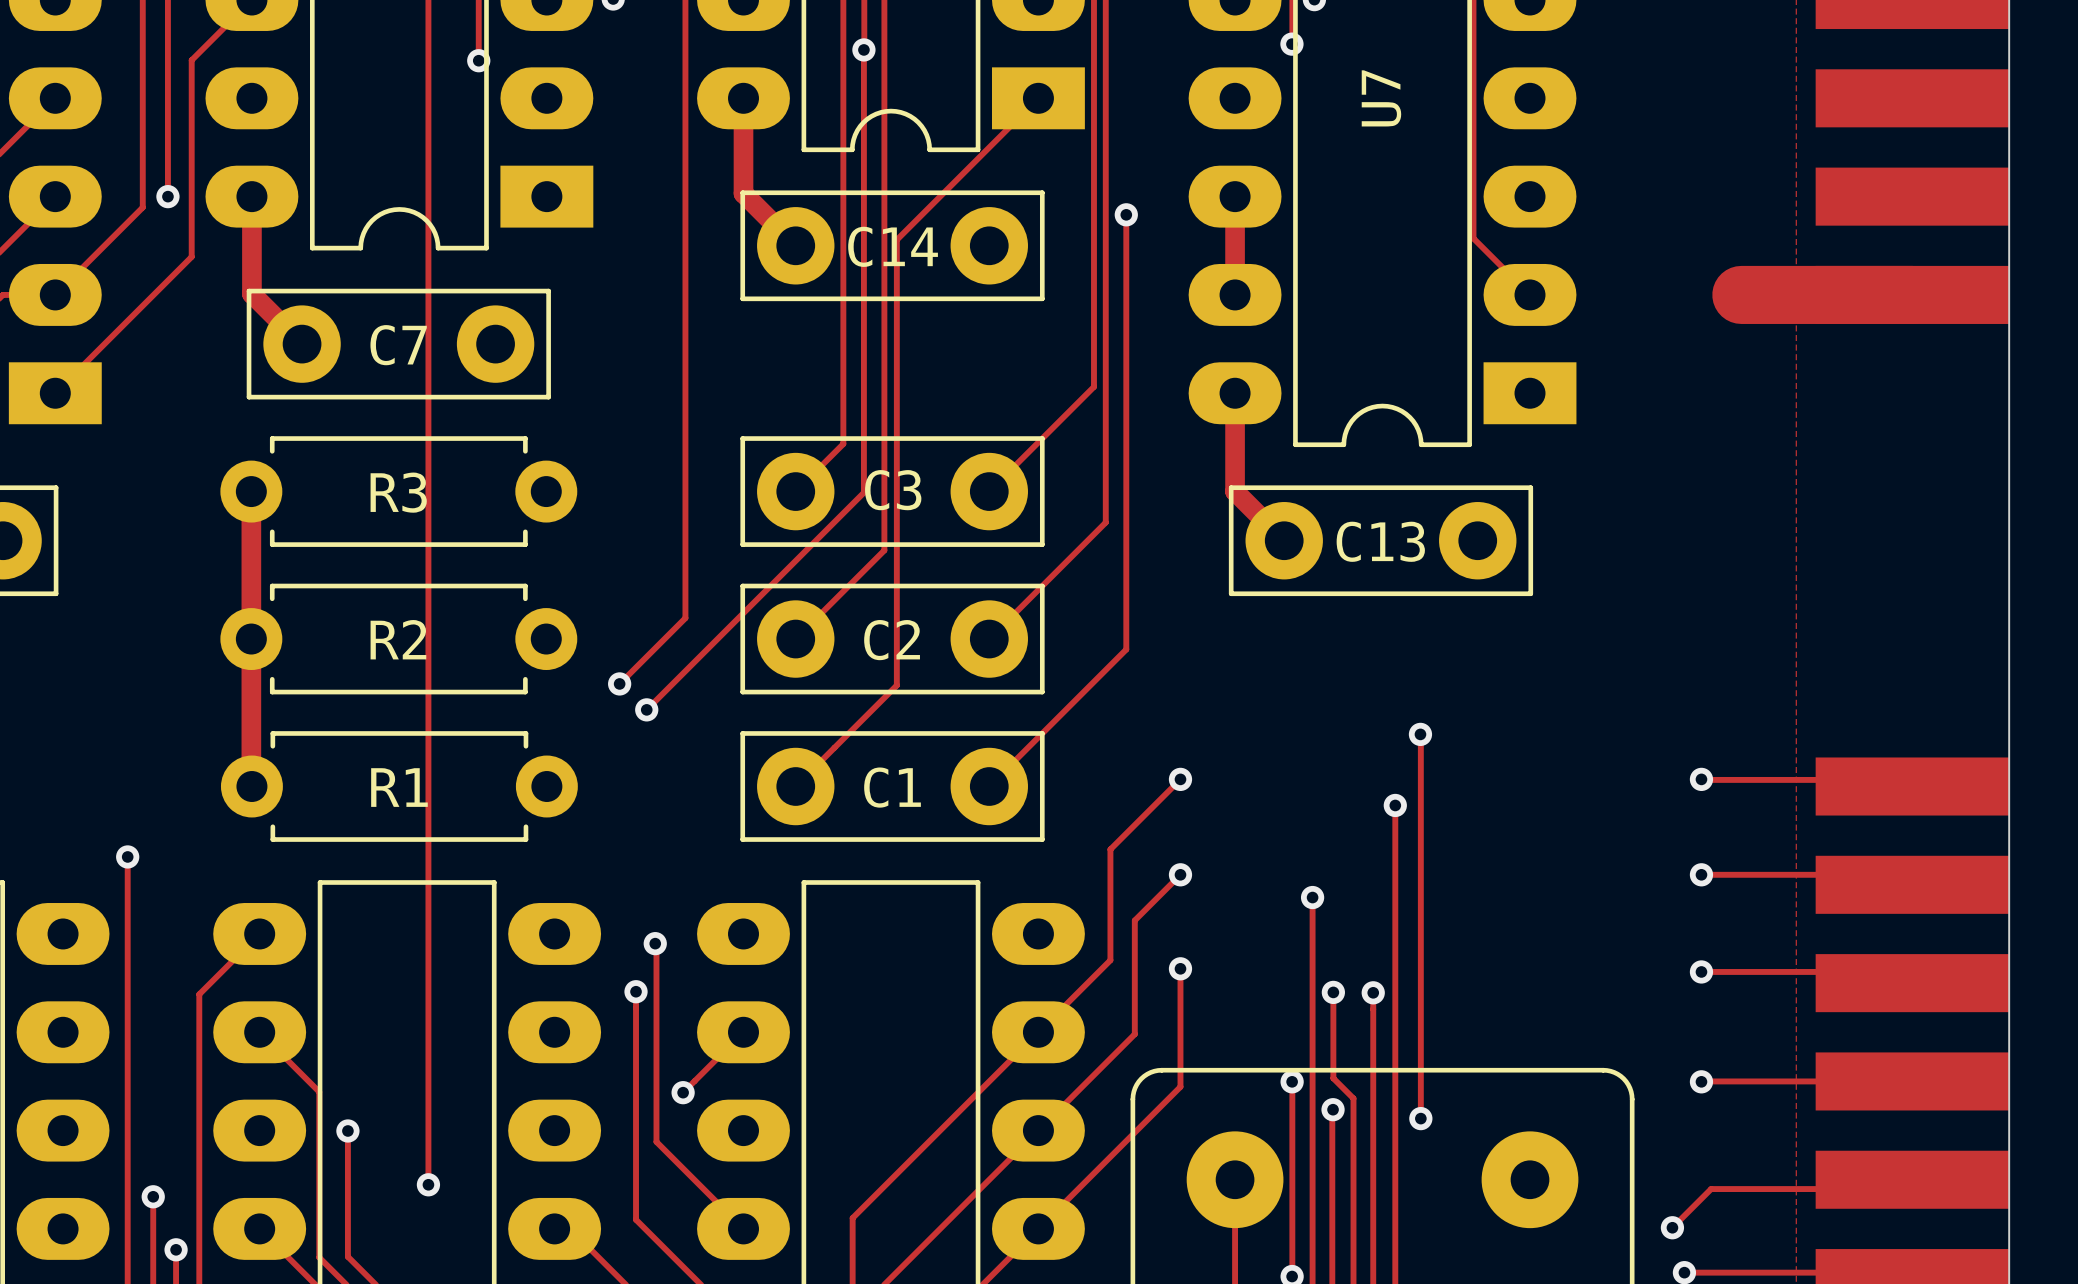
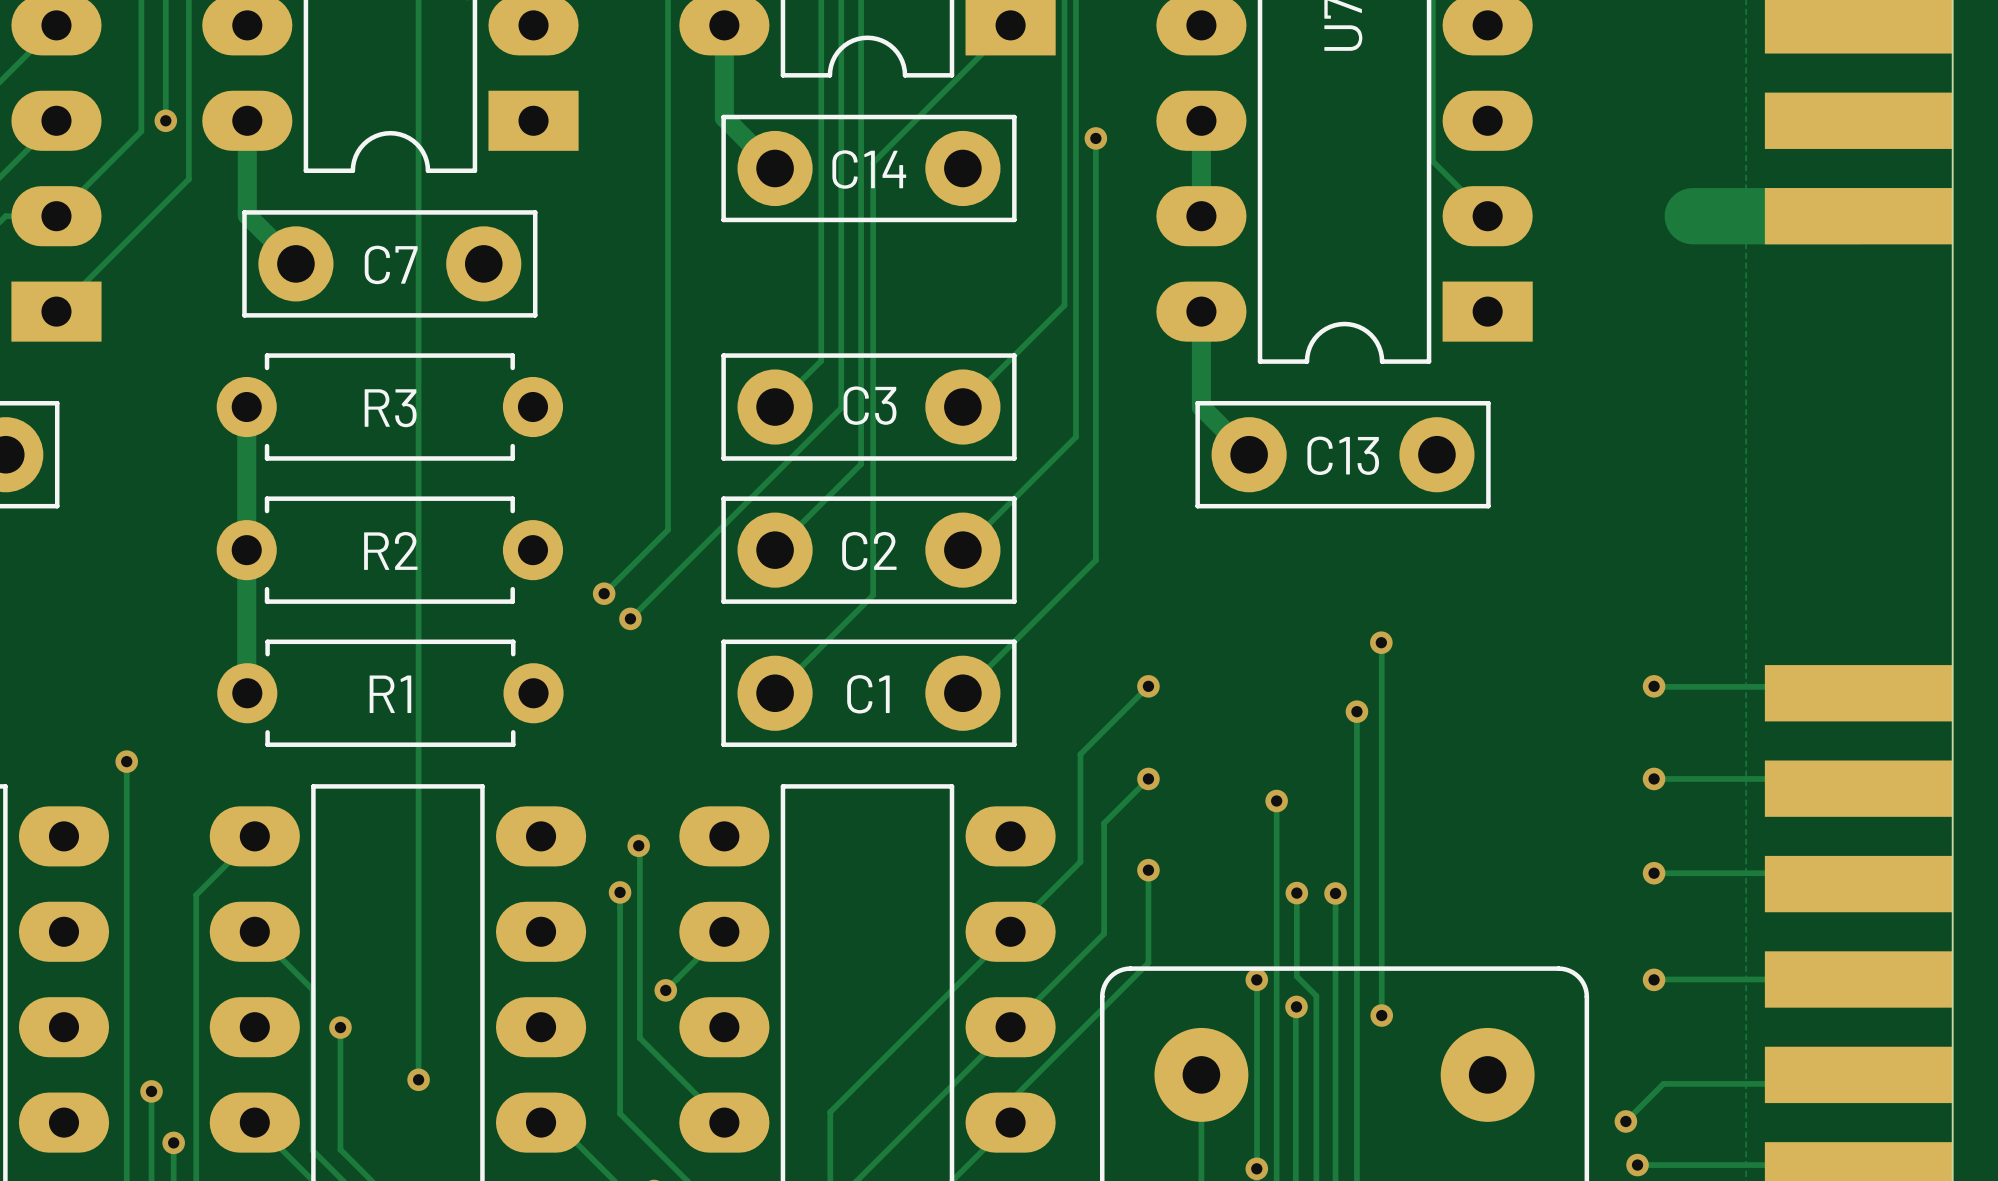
track: (1180, 1064) (1180, 1086) (1038, 1228) -> (1148, 962) (1010, 1100) (1010, 1122)

